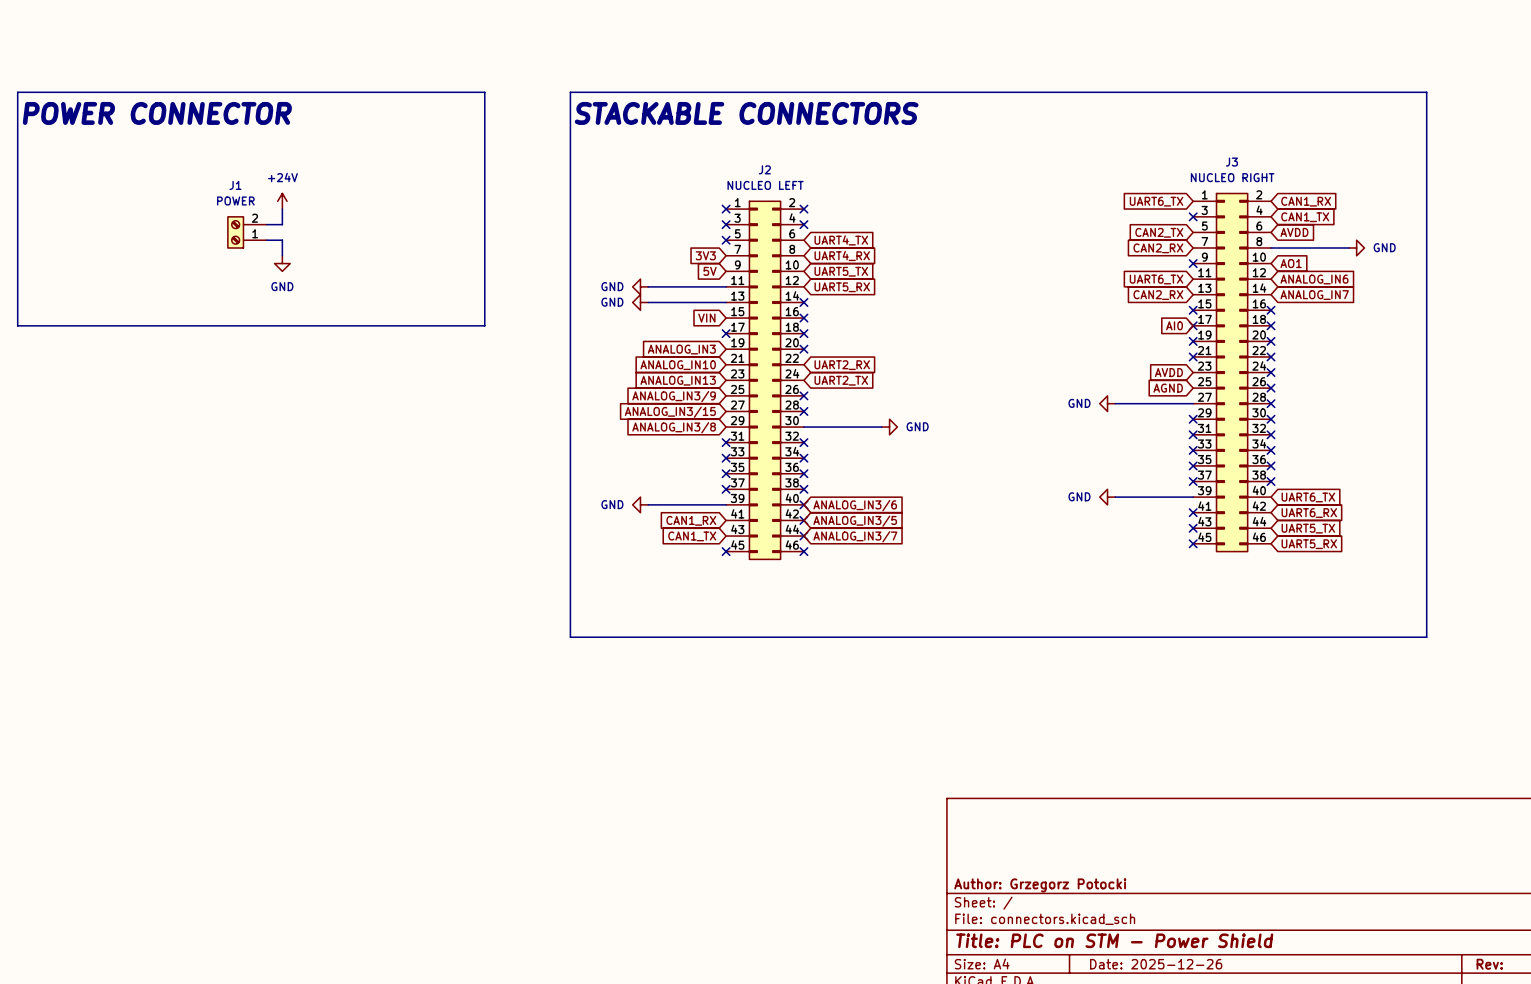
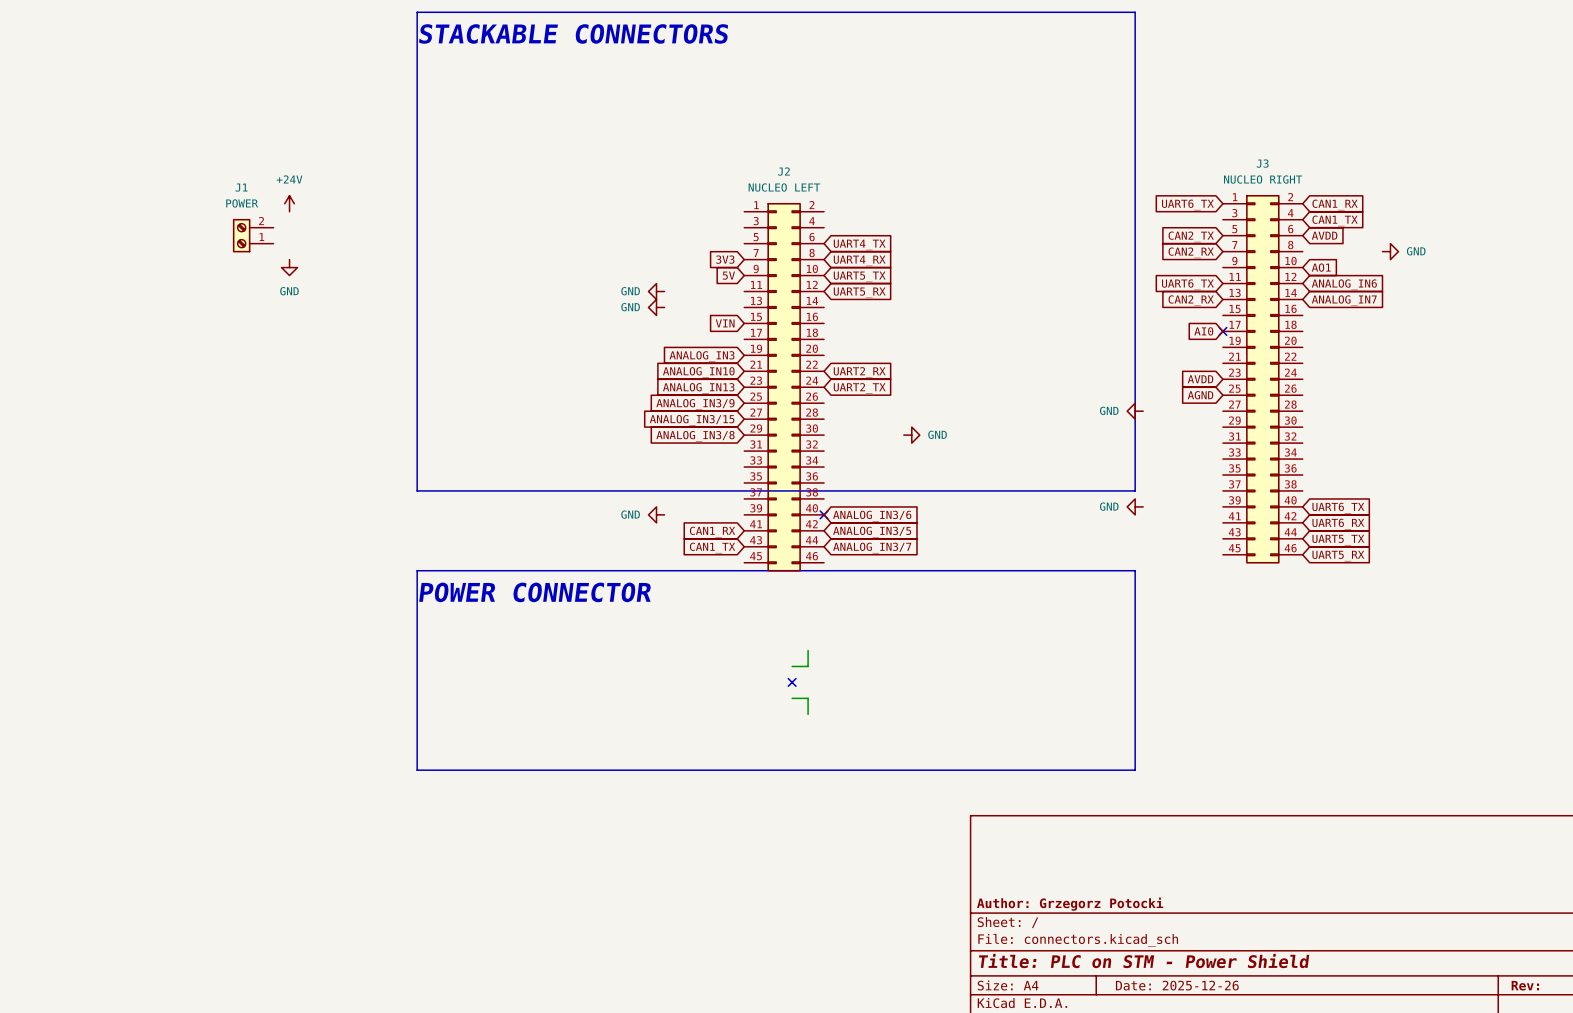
line: none -> (417, 12) (417, 490) (1135, 490) (1135, 12) (417, 12)
text: none -> STACKABLE CONNECTORS (573, 33)
line: (17, 92) (484, 92) (484, 325) (17, 325) (17, 92) -> none
line: (570, 92) (1426, 92) (1426, 637) (570, 637) (570, 92) -> none
text: POWER CONNECTOR (157, 113) -> none
text: STACKABLE CONNECTORS (746, 113) -> none
wire: (282, 209) (282, 224) (266, 224) -> none
no-connect mark: (726, 209) -> none
no-connect mark: (803, 209) -> none
no-connect mark: (1193, 216) -> none
no-connect mark: (726, 224) -> none
no-connect mark: (803, 224) -> none
wire: (266, 240) (282, 240) (282, 255) -> none
no-connect mark: (726, 240) -> none
wire: (1271, 247) (1348, 247) -> none
no-connect mark: (1193, 263) -> none
wire: (648, 286) (726, 286) -> none
wire: (648, 302) (726, 302) -> none
no-connect mark: (803, 302) -> none
no-connect mark: (1193, 310) -> none
no-connect mark: (1271, 310) -> none
no-connect mark: (803, 318) -> none
no-connect mark: (1271, 325) -> none
no-connect mark: (726, 333) -> none
no-connect mark: (803, 333) -> none
no-connect mark: (1193, 341) -> none
no-connect mark: (1271, 341) -> none
no-connect mark: (803, 349) -> none
no-connect mark: (1193, 356) -> none
no-connect mark: (1271, 356) -> none
no-connect mark: (1271, 372) -> none
no-connect mark: (1271, 388) -> none
no-connect mark: (803, 395) -> none
wire: (1115, 403) (1193, 403) -> none
no-connect mark: (1271, 403) -> none
no-connect mark: (803, 411) -> none
no-connect mark: (1193, 419) -> none
no-connect mark: (1271, 419) -> none
wire: (803, 427) (881, 427) -> none
no-connect mark: (1193, 434) -> none
no-connect mark: (1271, 434) -> none
no-connect mark: (726, 442) -> none
no-connect mark: (803, 442) -> none
no-connect mark: (1193, 450) -> none
no-connect mark: (1271, 450) -> none
no-connect mark: (726, 458) -> none
no-connect mark: (803, 458) -> none
no-connect mark: (1193, 465) -> none
no-connect mark: (1271, 465) -> none
no-connect mark: (726, 473) -> none
no-connect mark: (803, 473) -> none
no-connect mark: (1193, 481) -> none
no-connect mark: (1271, 481) -> none
no-connect mark: (726, 489) -> none
no-connect mark: (803, 489) -> none
wire: (1115, 497) (1193, 497) -> none
wire: (648, 504) (726, 504) -> none
no-connect mark: (1193, 512) -> none
no-connect mark: (803, 520) -> none
no-connect mark: (1193, 528) -> none
no-connect mark: (803, 536) -> none
no-connect mark: (1193, 543) -> none
no-connect mark: (726, 551) -> none
no-connect mark: (803, 551) -> none
line: none -> (417, 570) (1135, 570) (1135, 770) (417, 770) (417, 570)
text: none -> POWER CONNECTOR (535, 592)
wire: none -> (808, 650) (808, 666) (792, 666)
no-connect mark: none -> (792, 682)
wire: none -> (792, 698) (808, 698) (808, 714)

